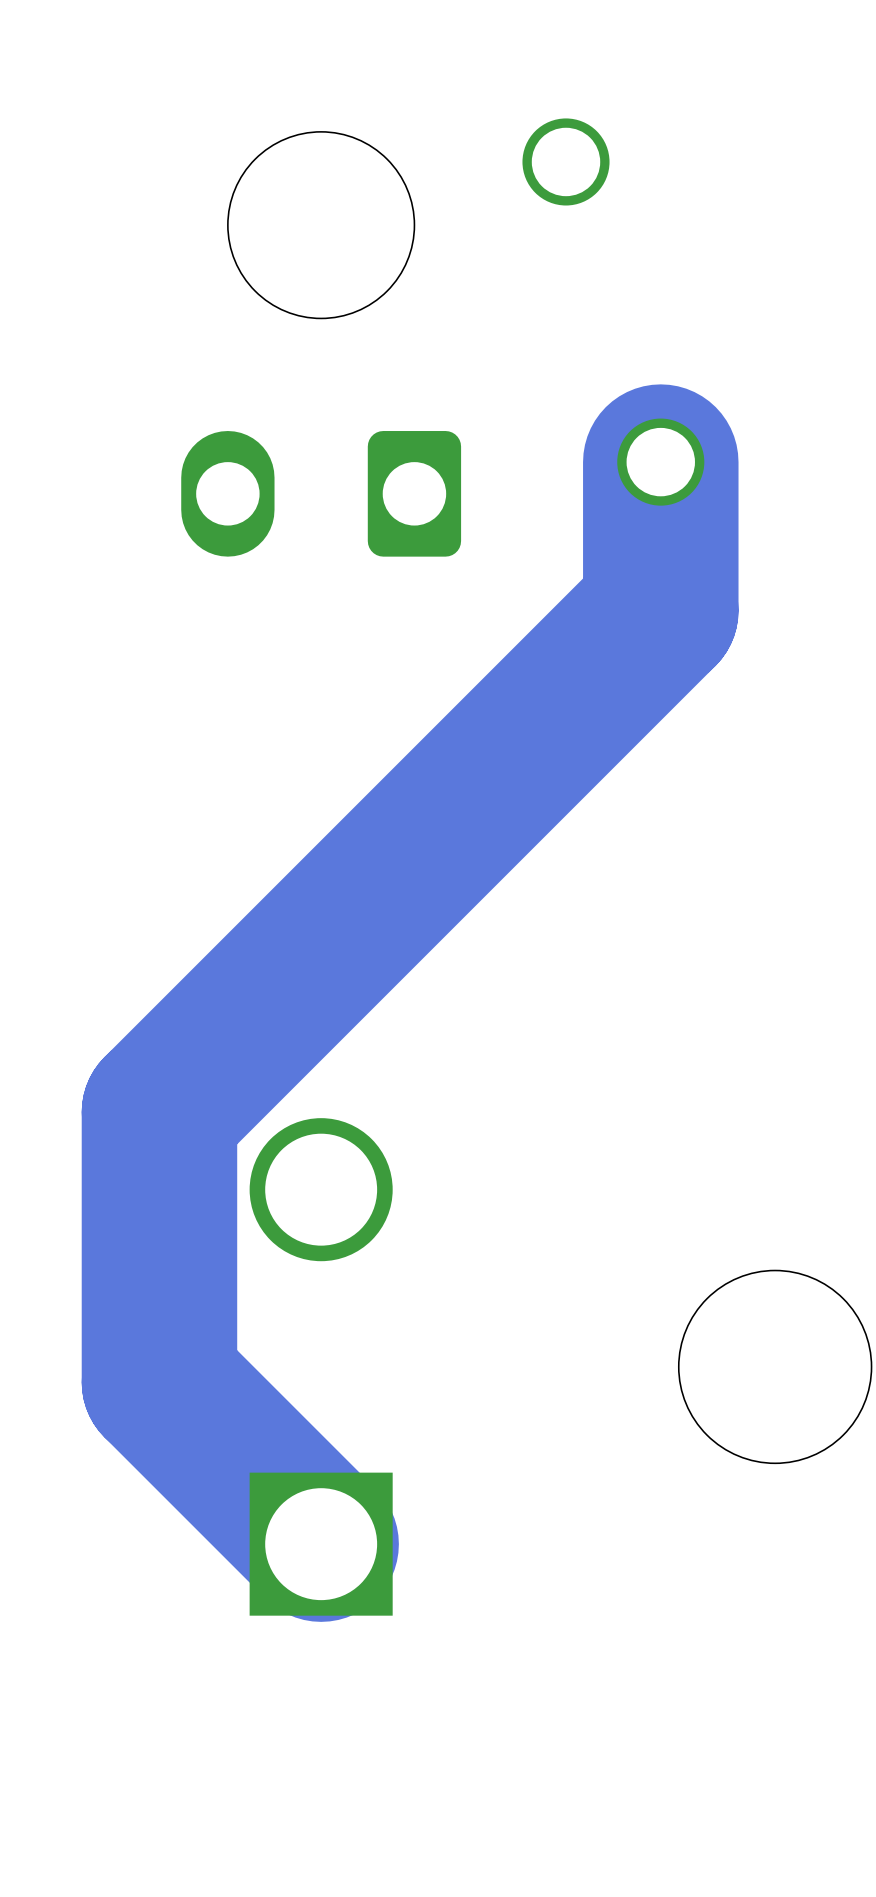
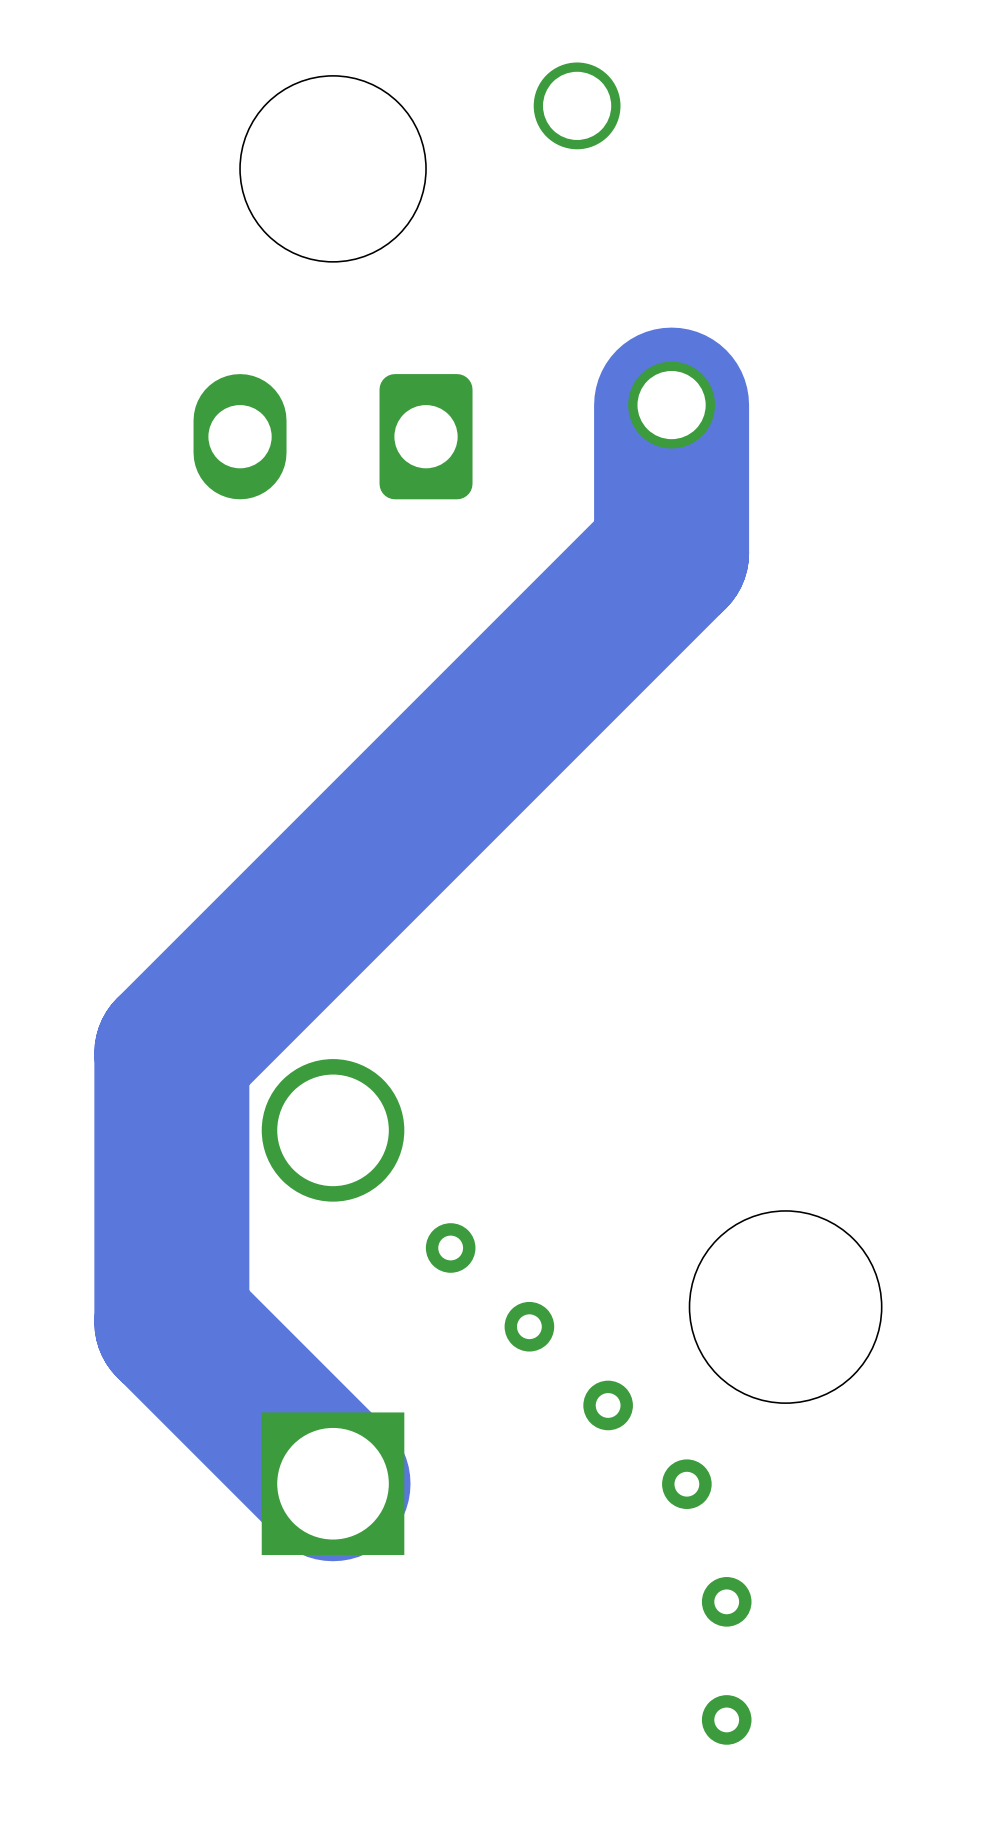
via: none -> (450, 1247)
via: none -> (529, 1326)
via: none -> (608, 1405)
via: none -> (686, 1484)
via: none -> (726, 1601)
via: none -> (726, 1719)

